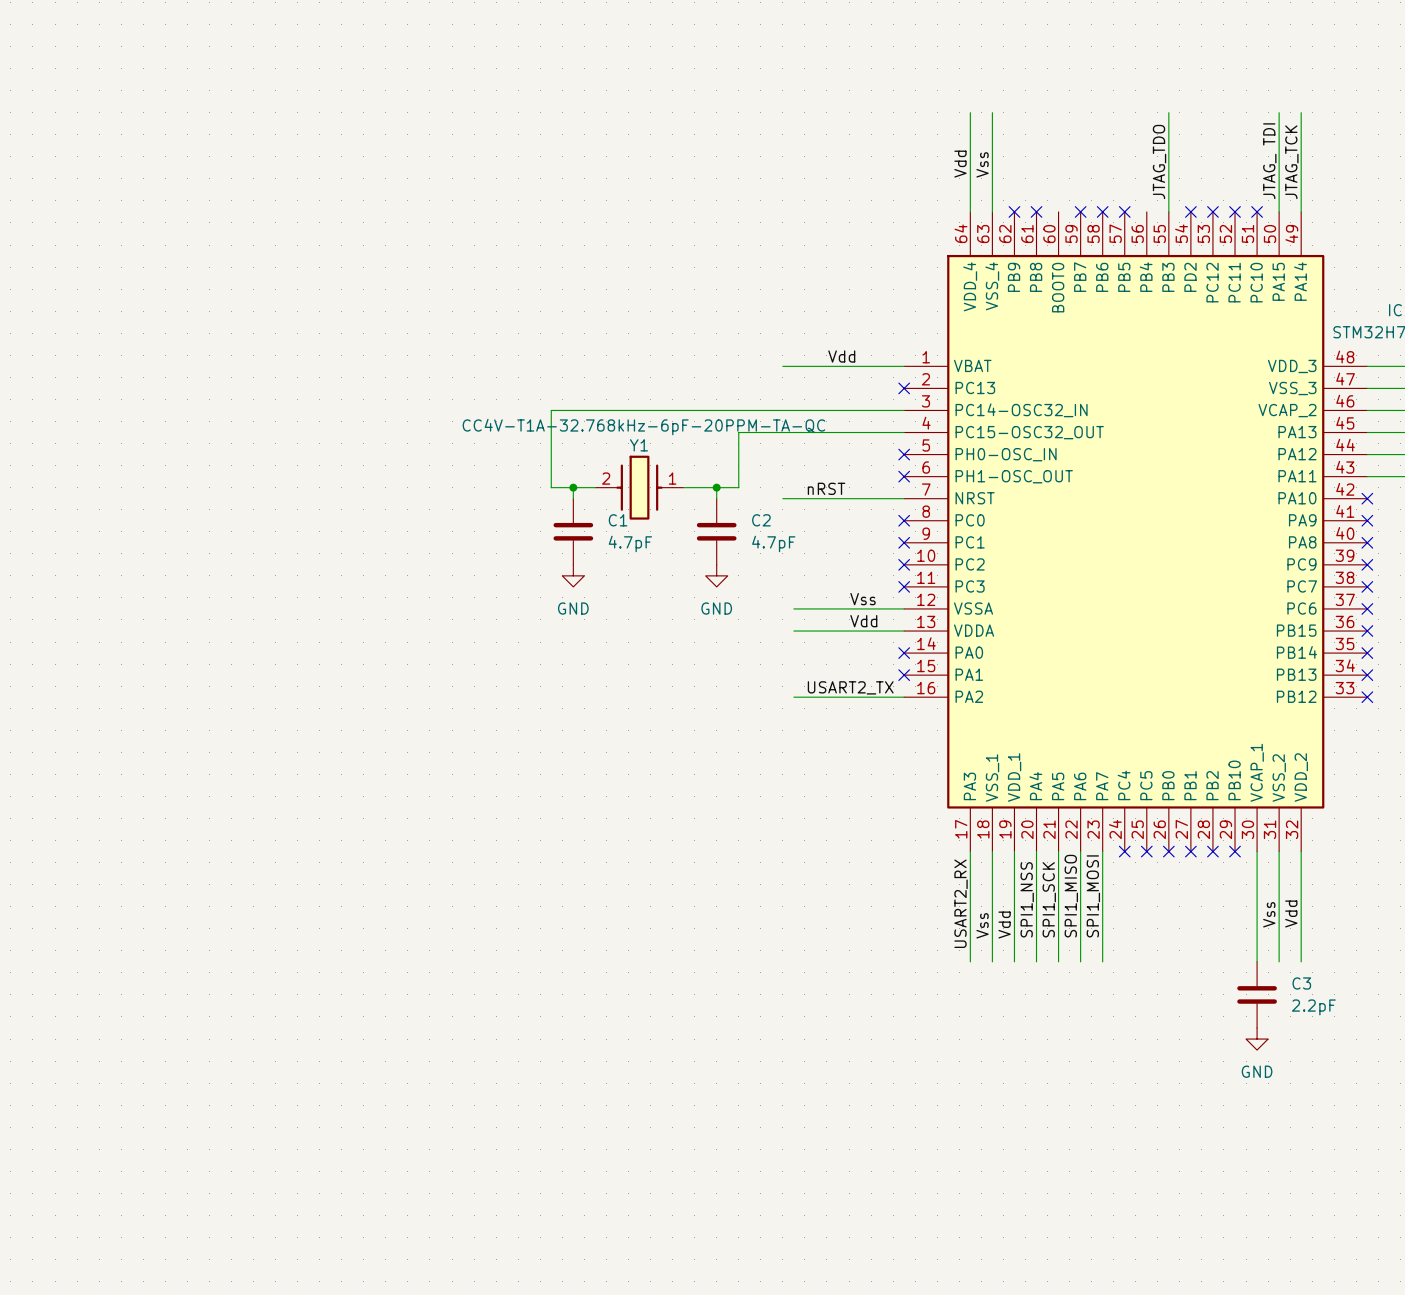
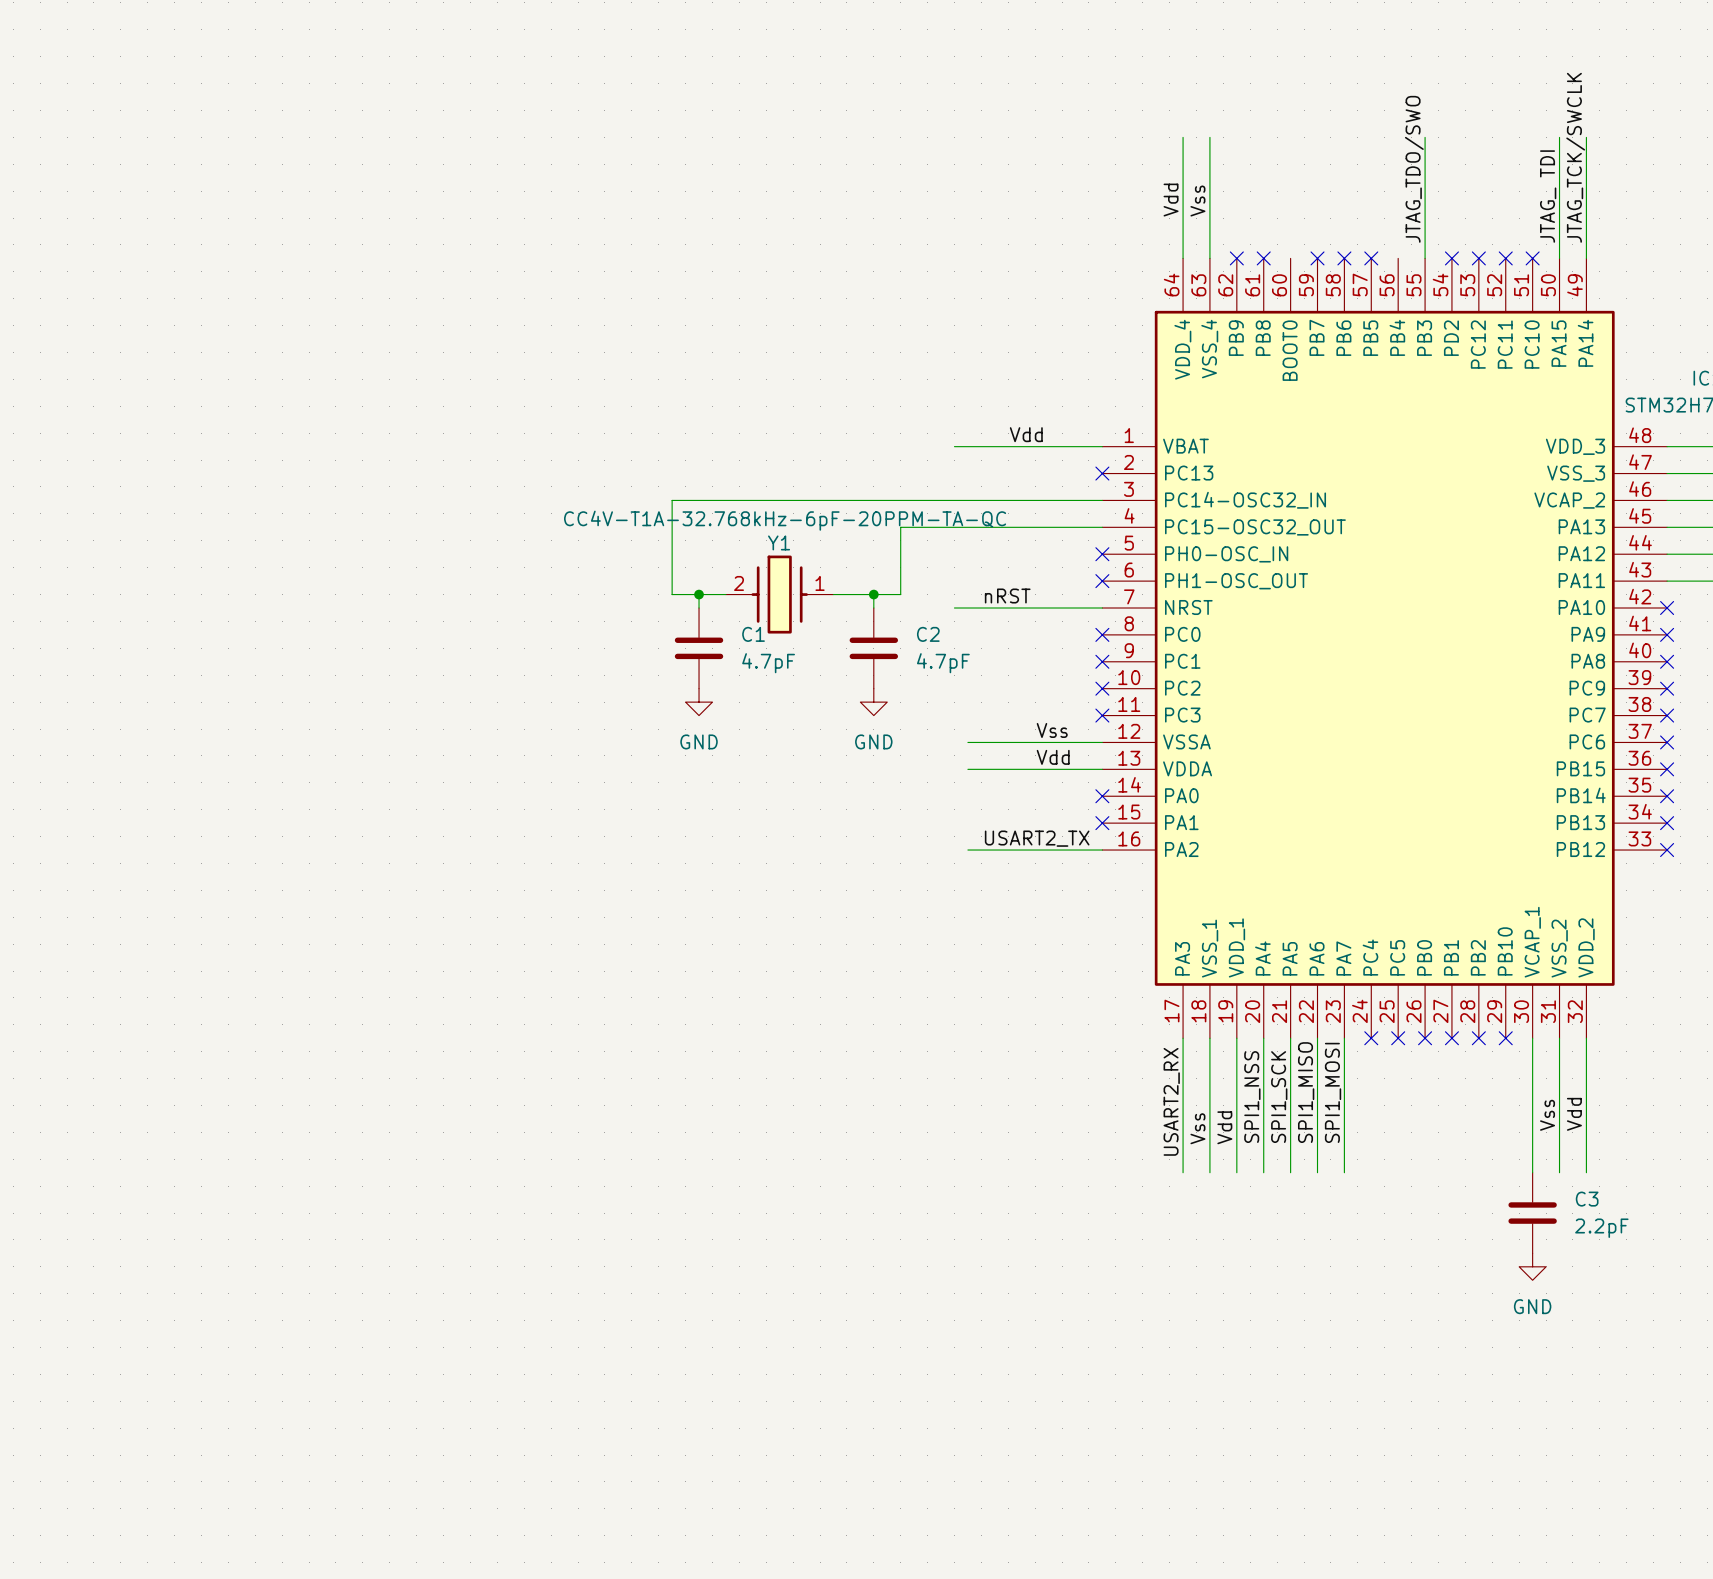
label: JTAG_TDO (1159, 161) -> JTAG_TDO/SWO (1414, 169)
label: JTAG_TCK (1291, 162) -> JTAG_TCK/SWCLK (1575, 157)

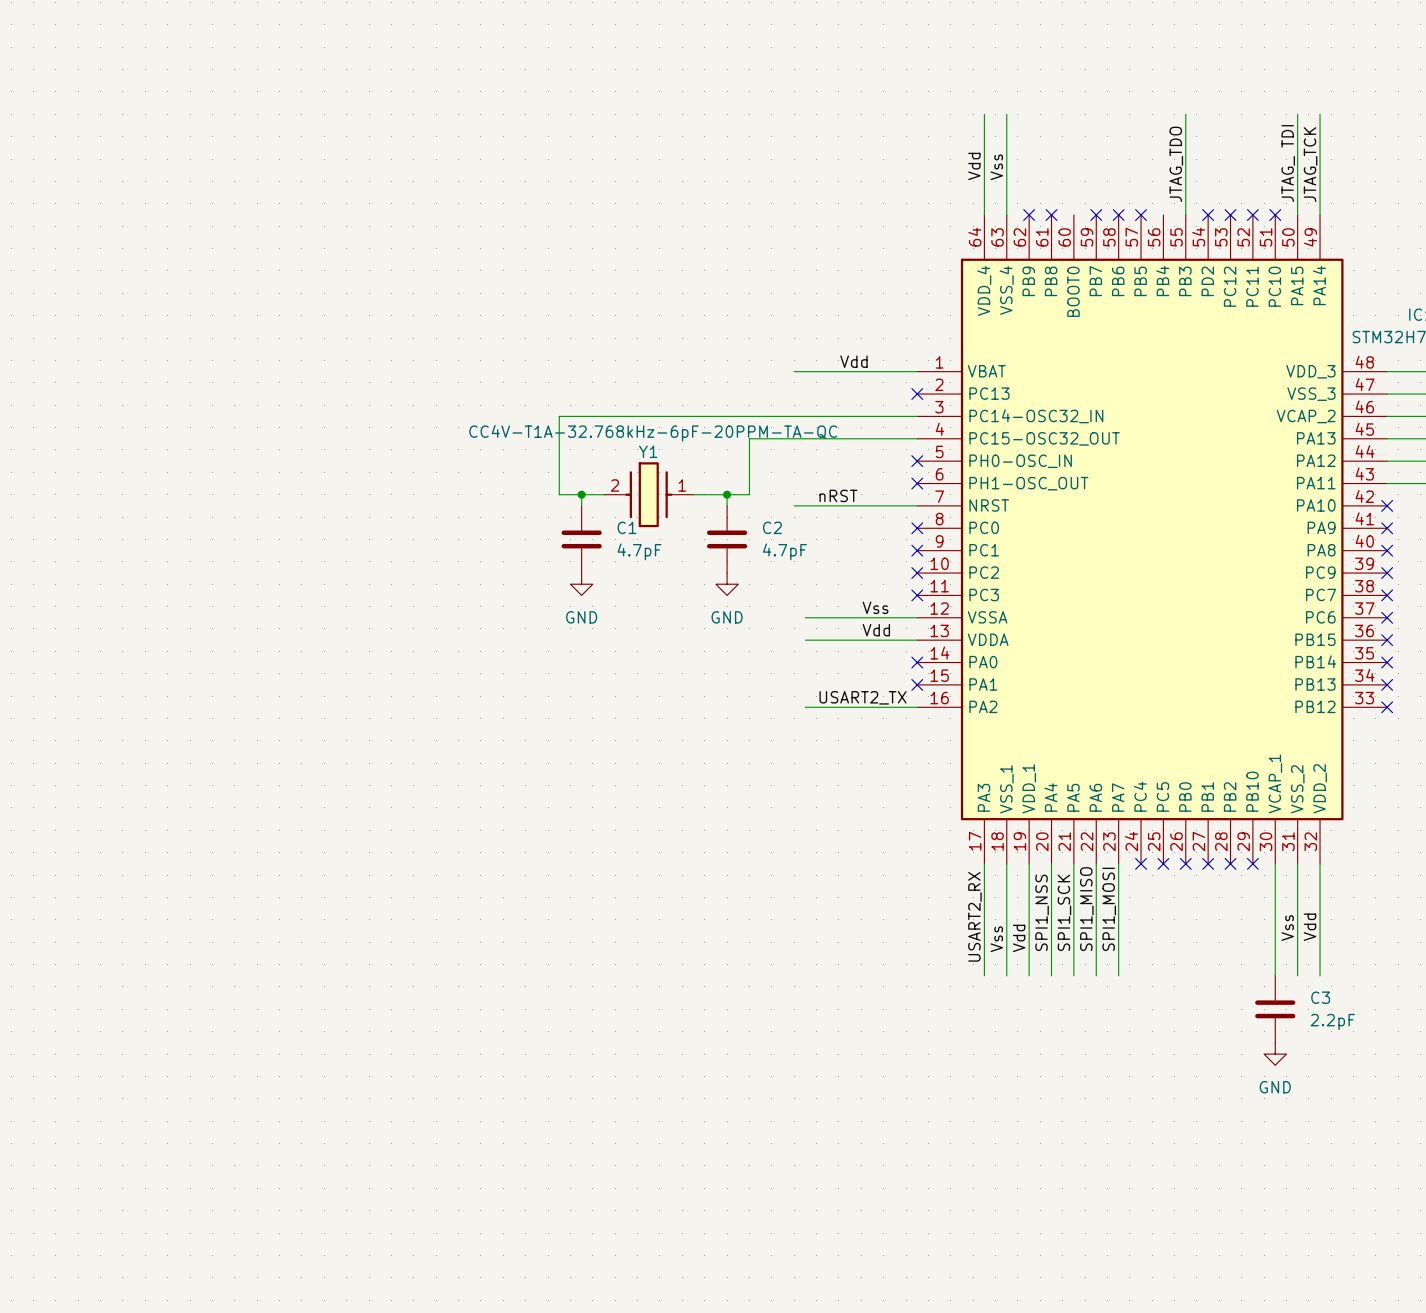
label: JTAG_TCK/SWCLK (1575, 157) -> JTAG_TCK (1310, 164)
label: JTAG_TDO/SWO (1414, 169) -> JTAG_TDO (1176, 164)

